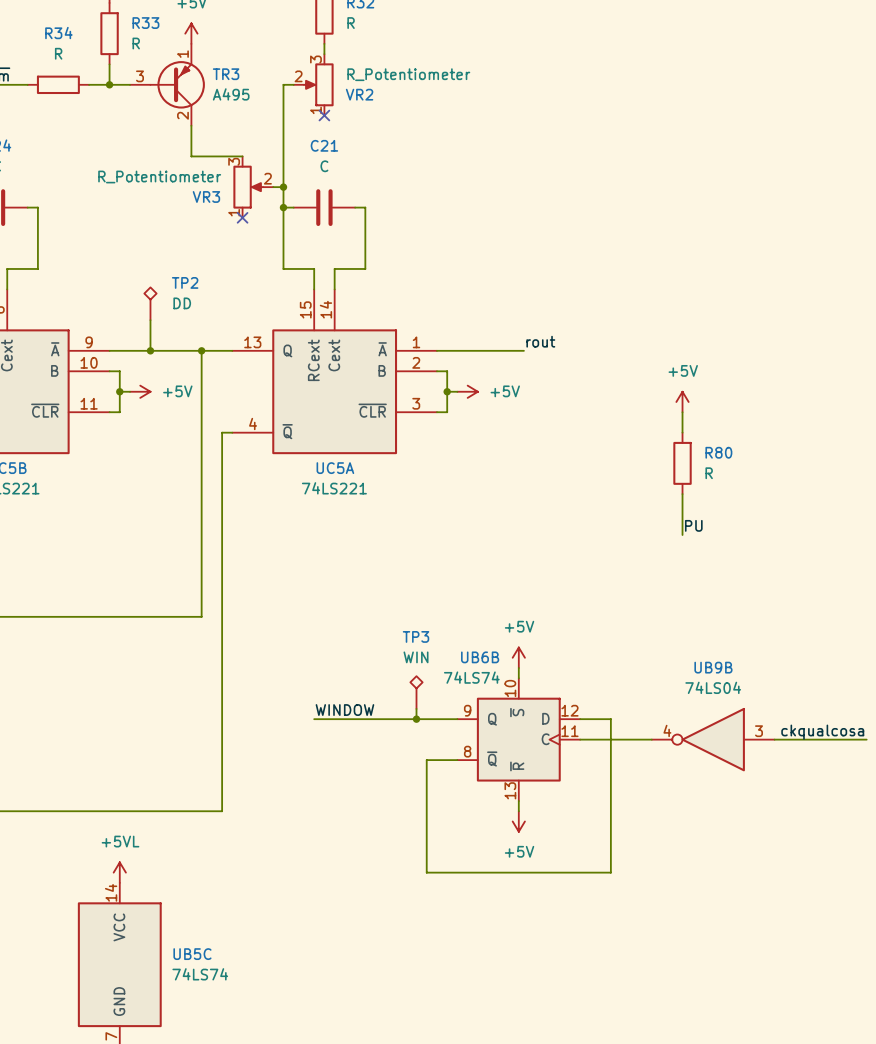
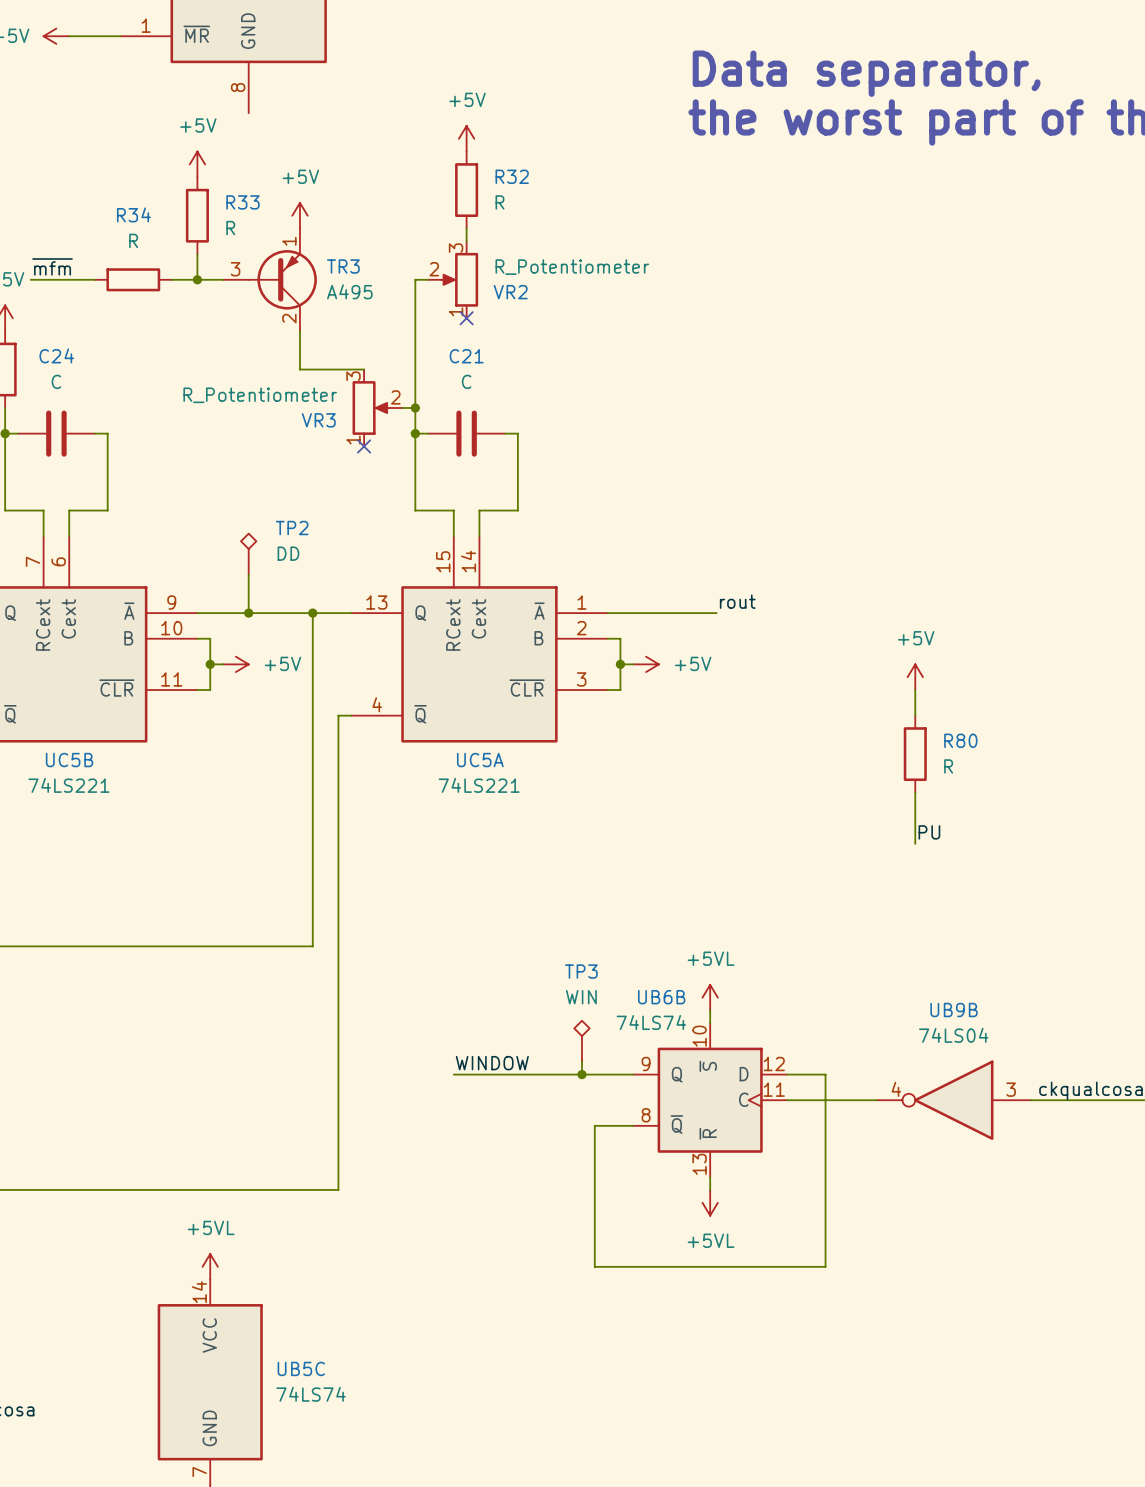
power symbol: +5V (518, 657) -> +5VL (710, 997)
power symbol: +5V (518, 821) -> +5VL (710, 1202)

